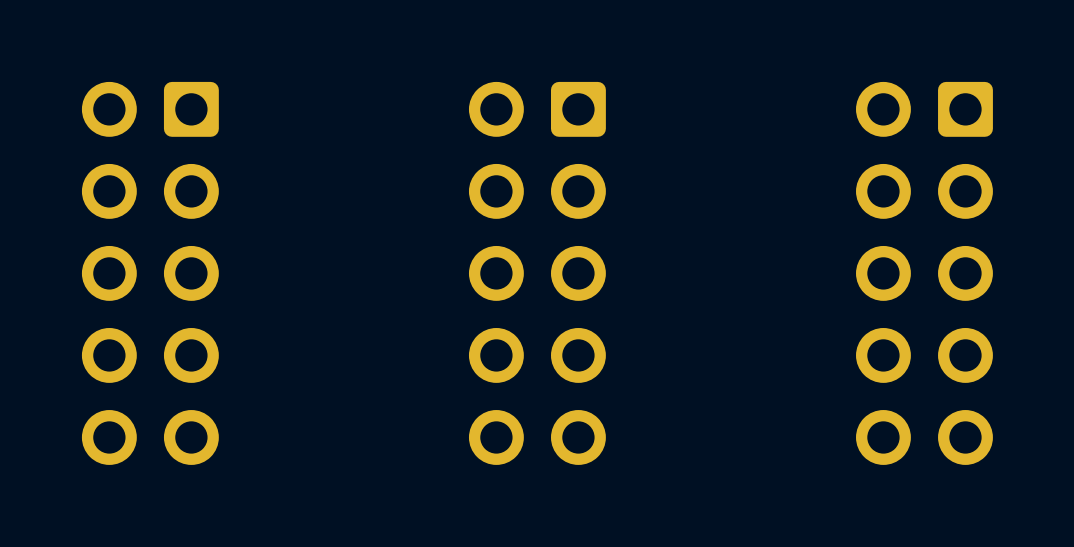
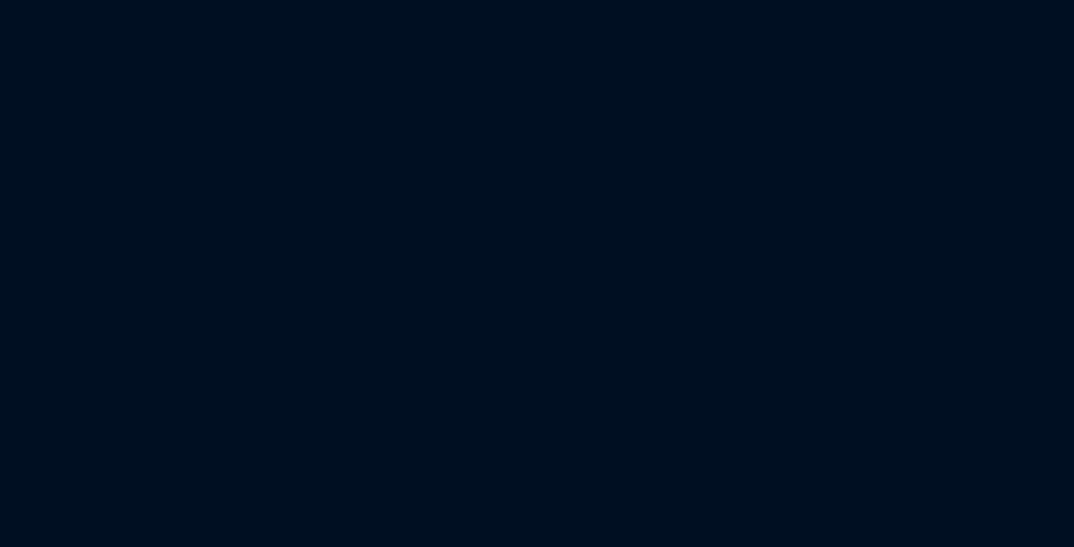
part: (150, 273) -> none
part: (537, 273) -> none
part: (924, 273) -> none

